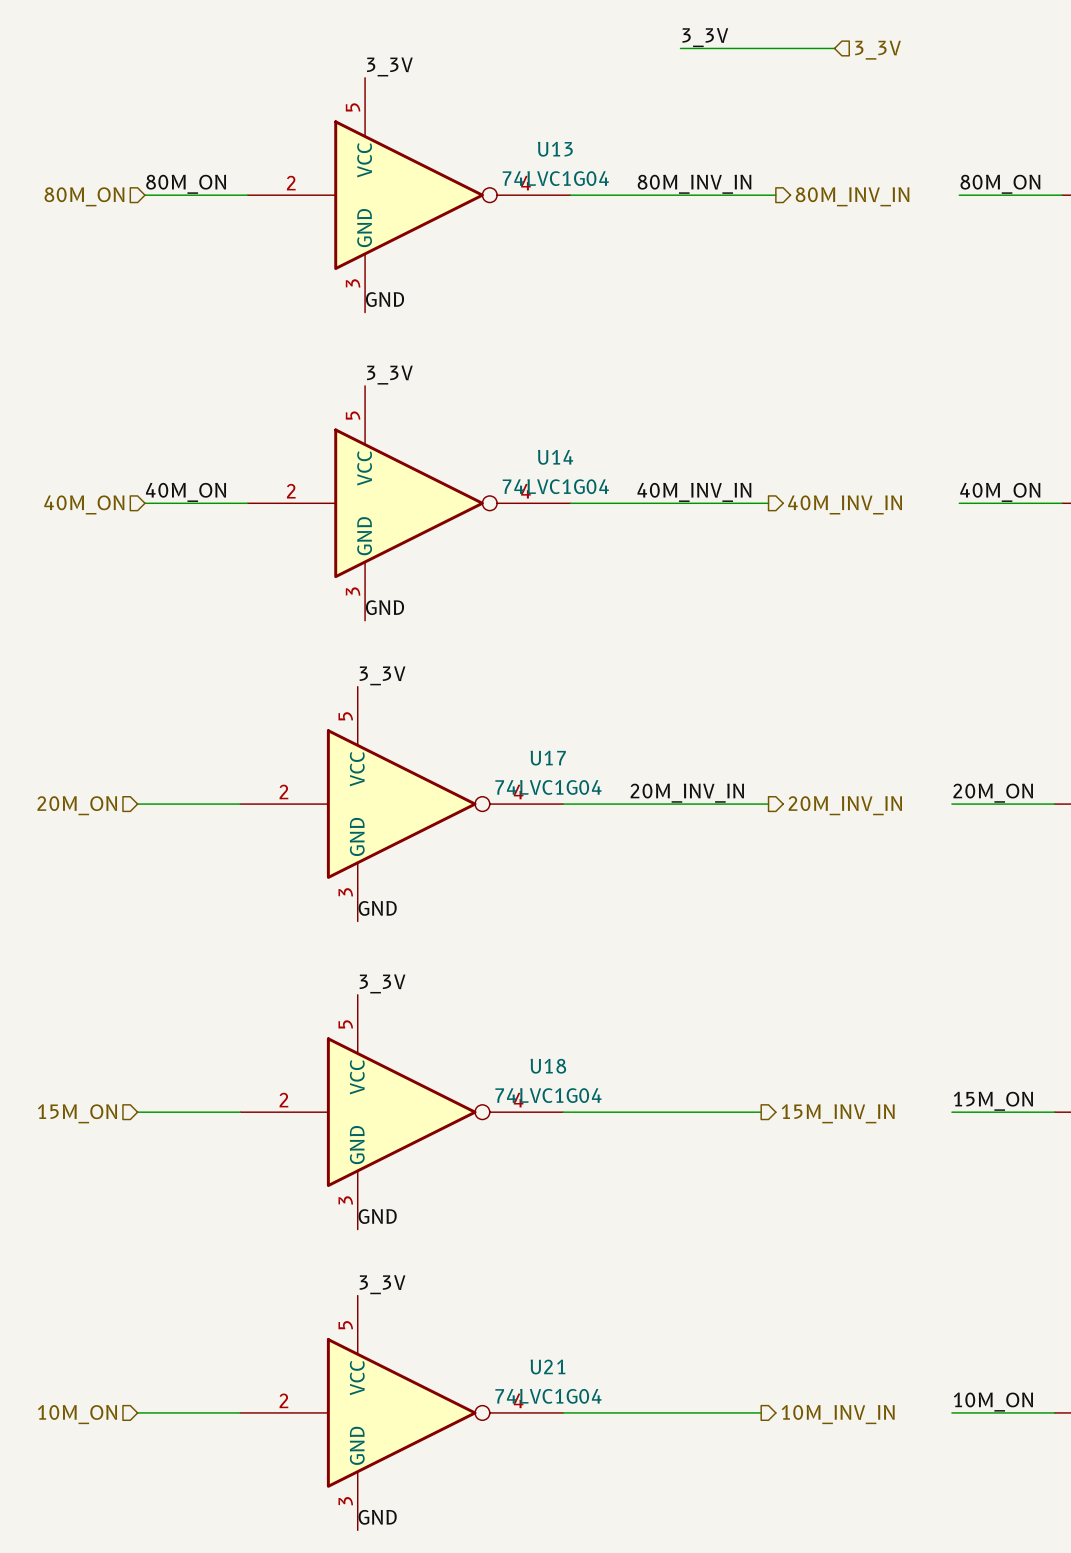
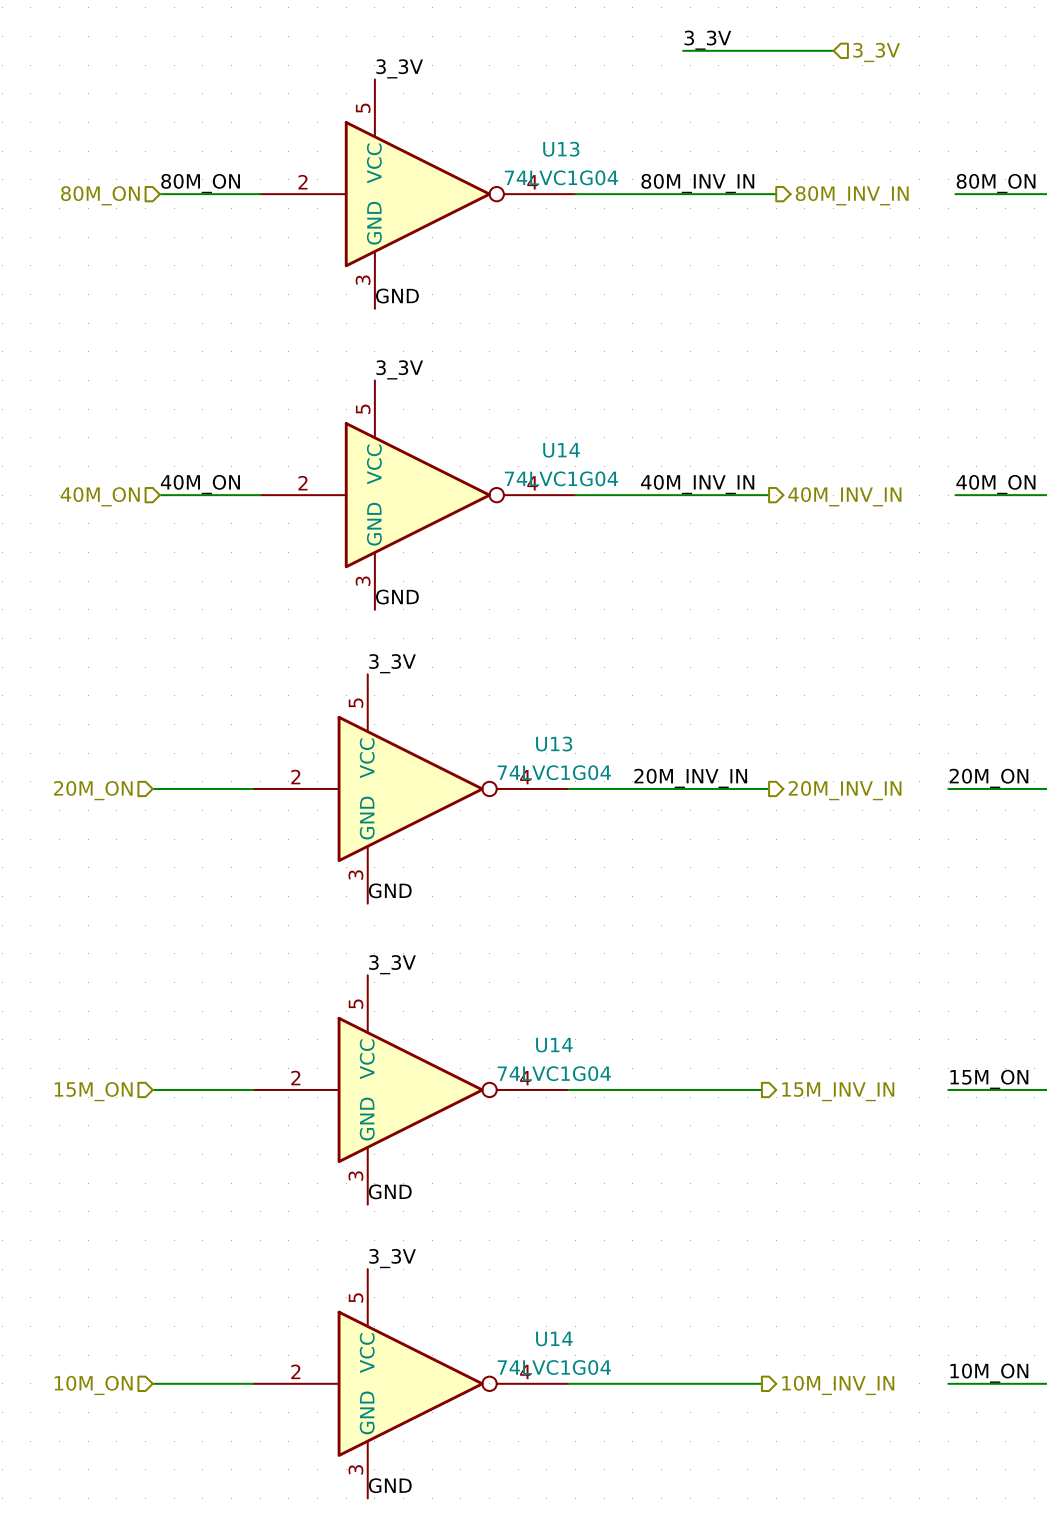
U17 name: U17 (548, 758) -> U13 (554, 744)
U18 name: U18 (548, 1066) -> U14 (554, 1045)
U21 name: U21 (547, 1367) -> U14 (554, 1338)

